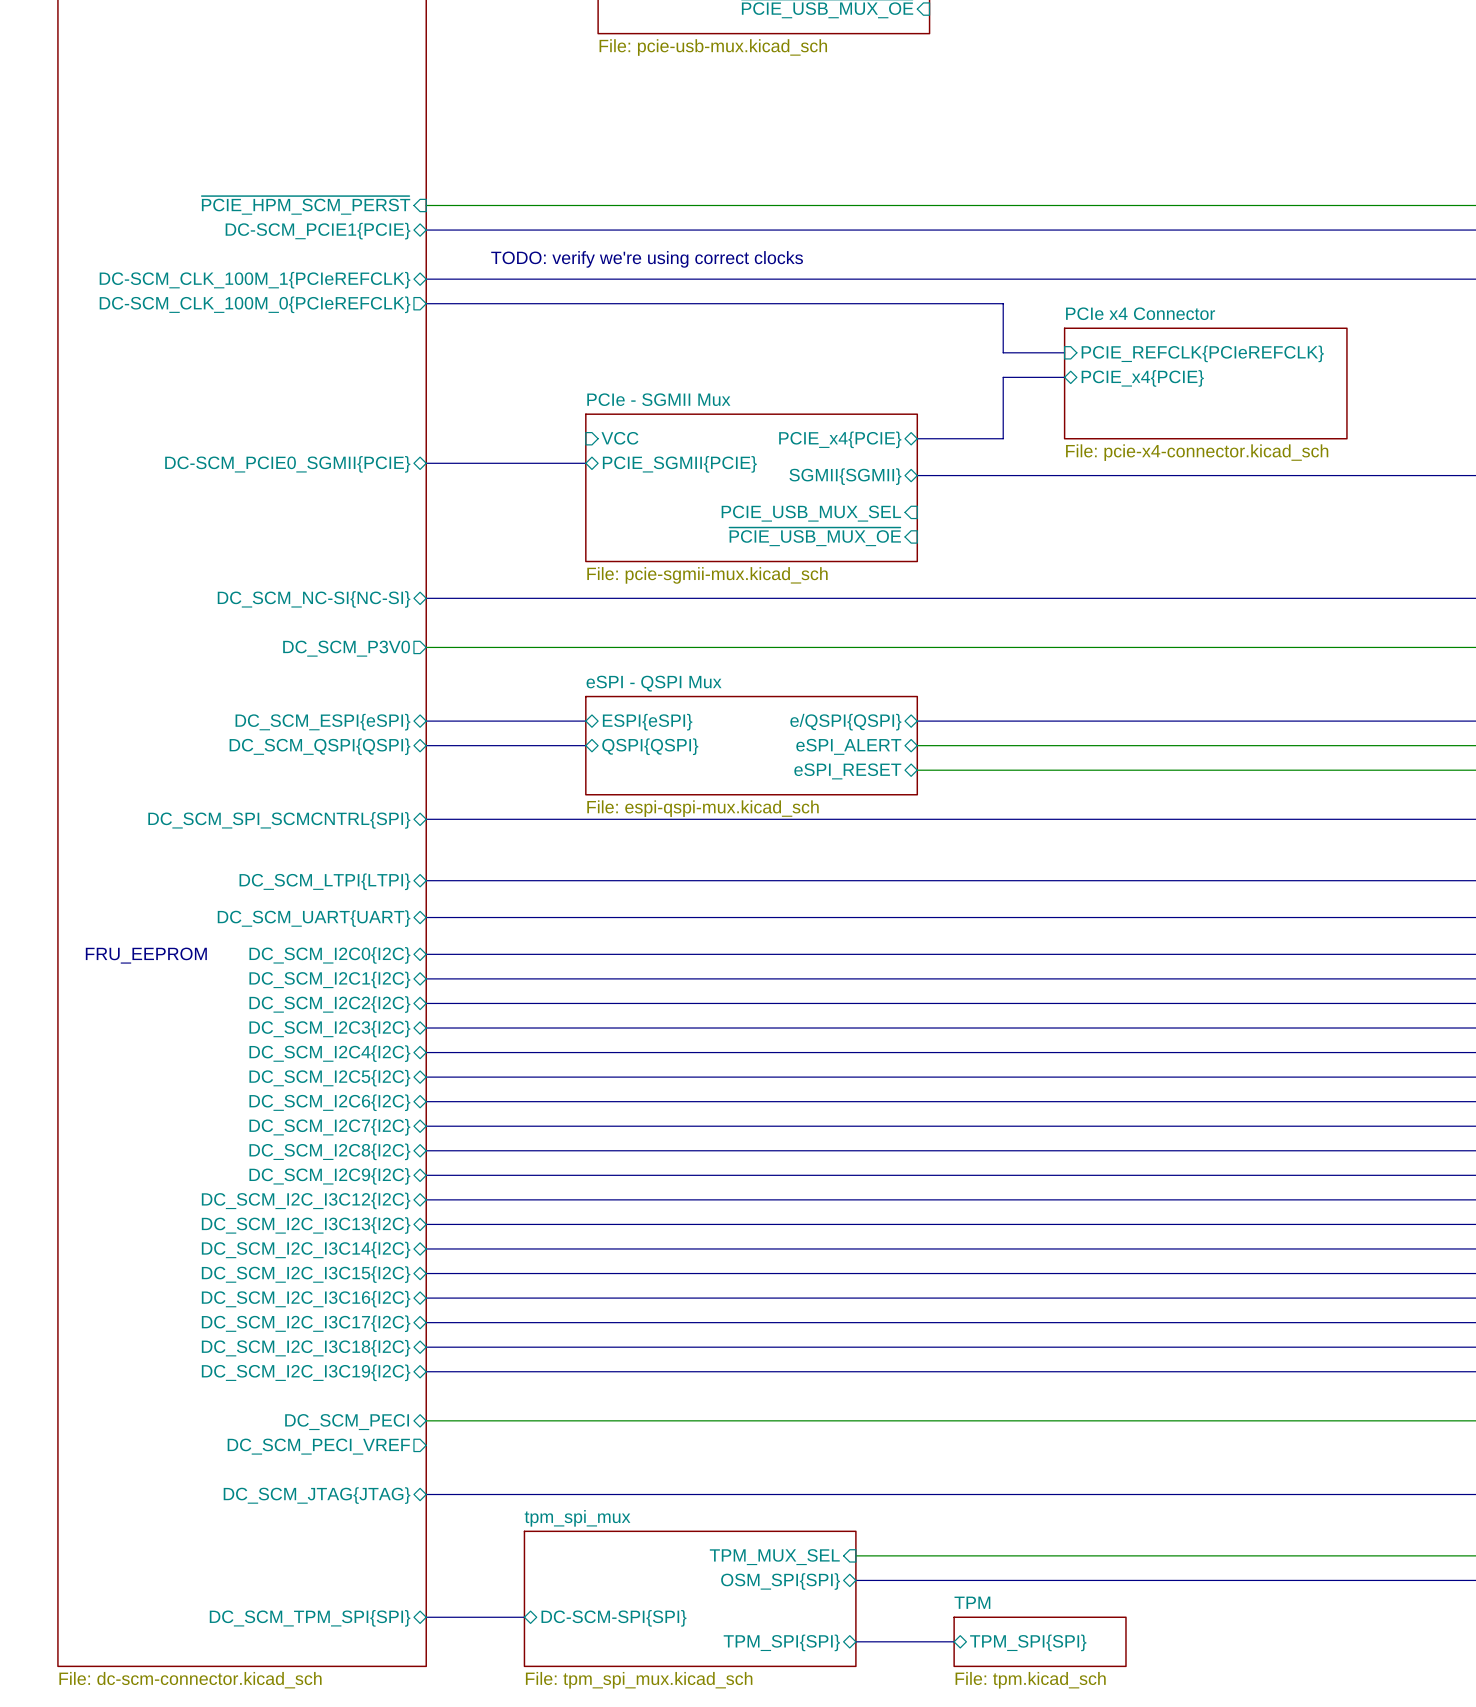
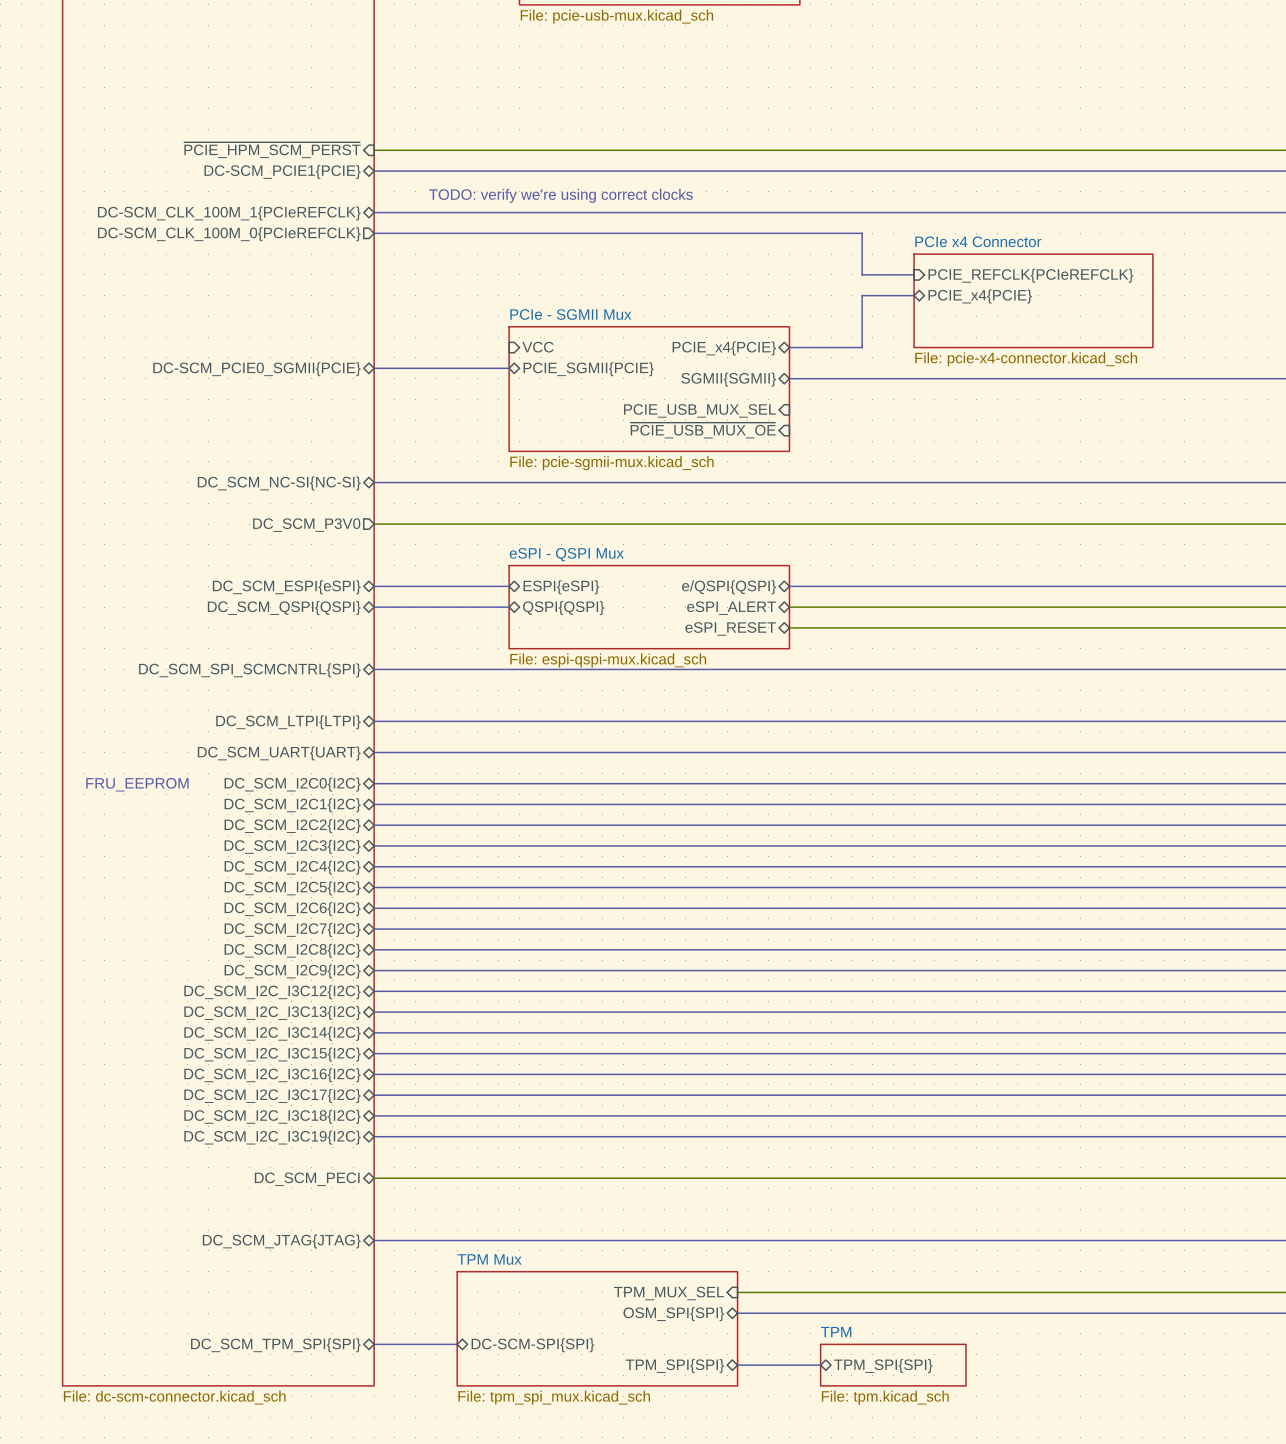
sheet pin: DC_SCM_PECI_VREF (318, 1446) -> none
sheet tpm_spi_mux name: tpm_spi_mux (577, 1518) -> TPM Mux (489, 1259)

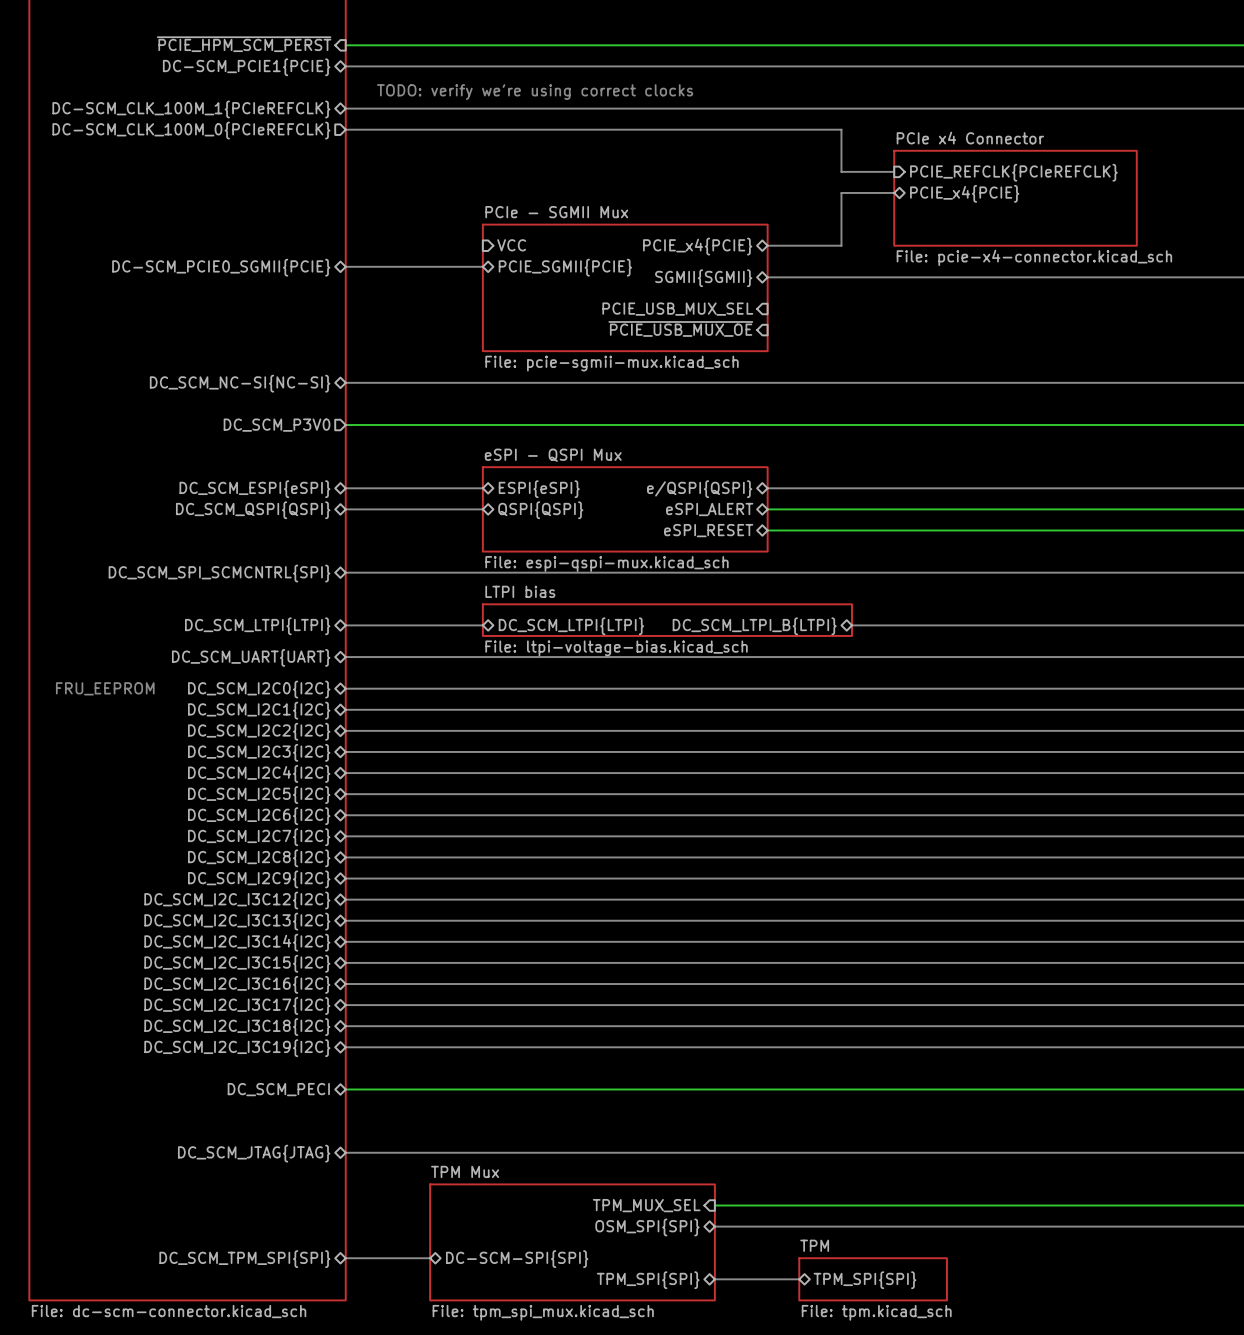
sheet LTPI bias: none -> File: ltpi-voltage-bias.kicad_sch (667, 620)
bus: (509, 721) (872, 721) -> none
sheet pin: none -> DC_SCM_LTPI{LTPI} (571, 626)
sheet pin: none -> DC_SCM_LTPI_B{LTPI} (754, 626)

